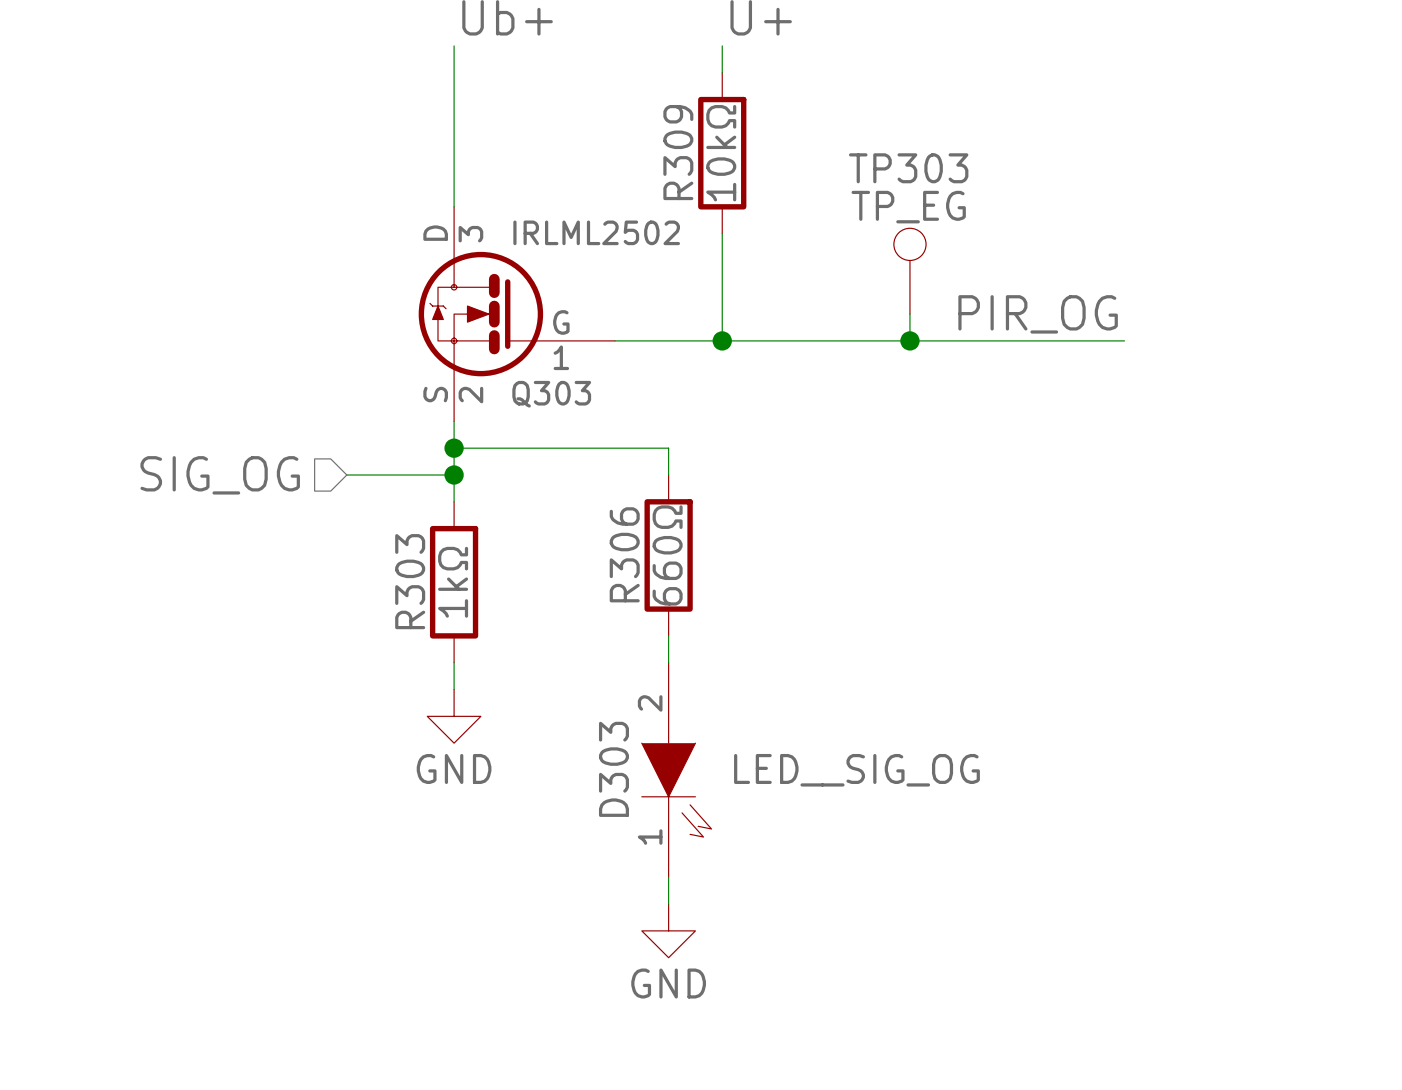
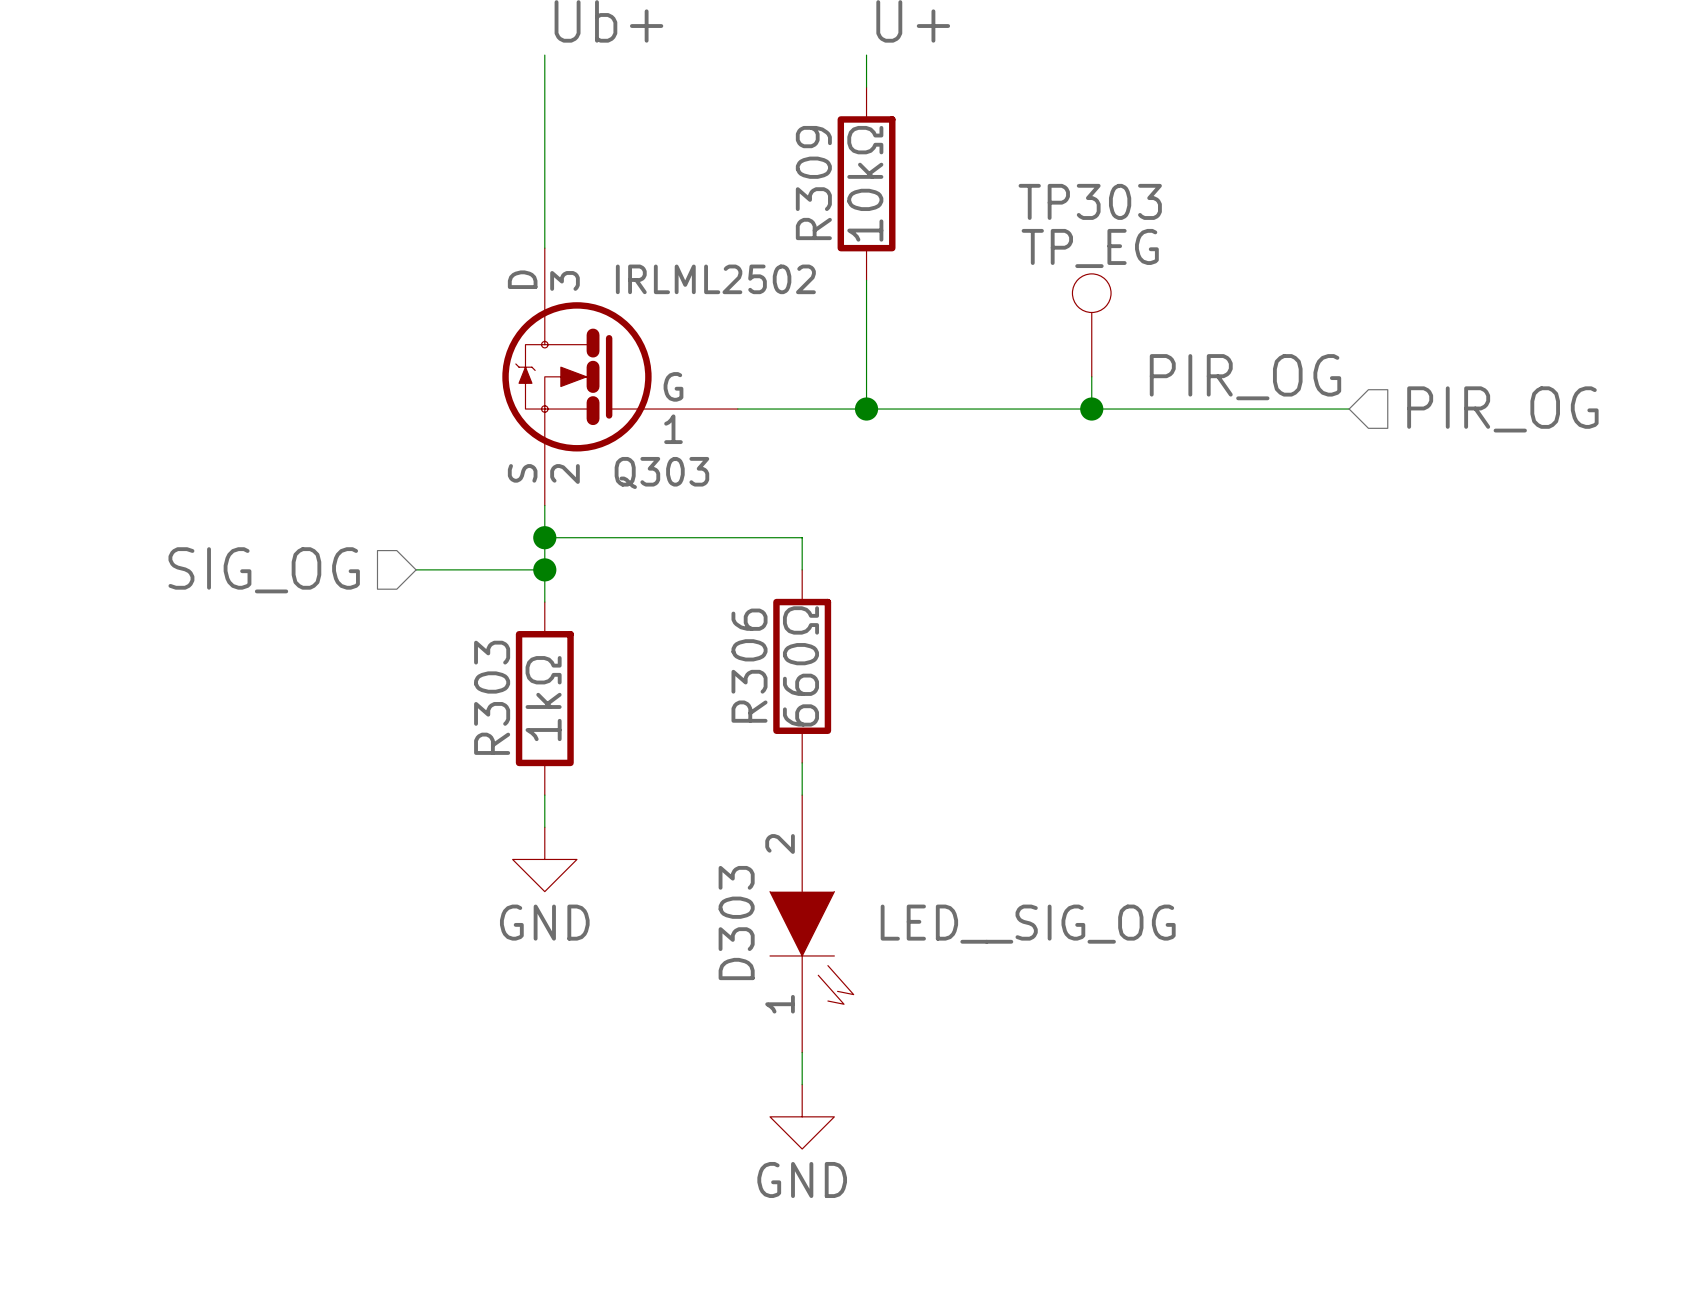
hierarchical label: none -> PIR_OG (1502, 409)

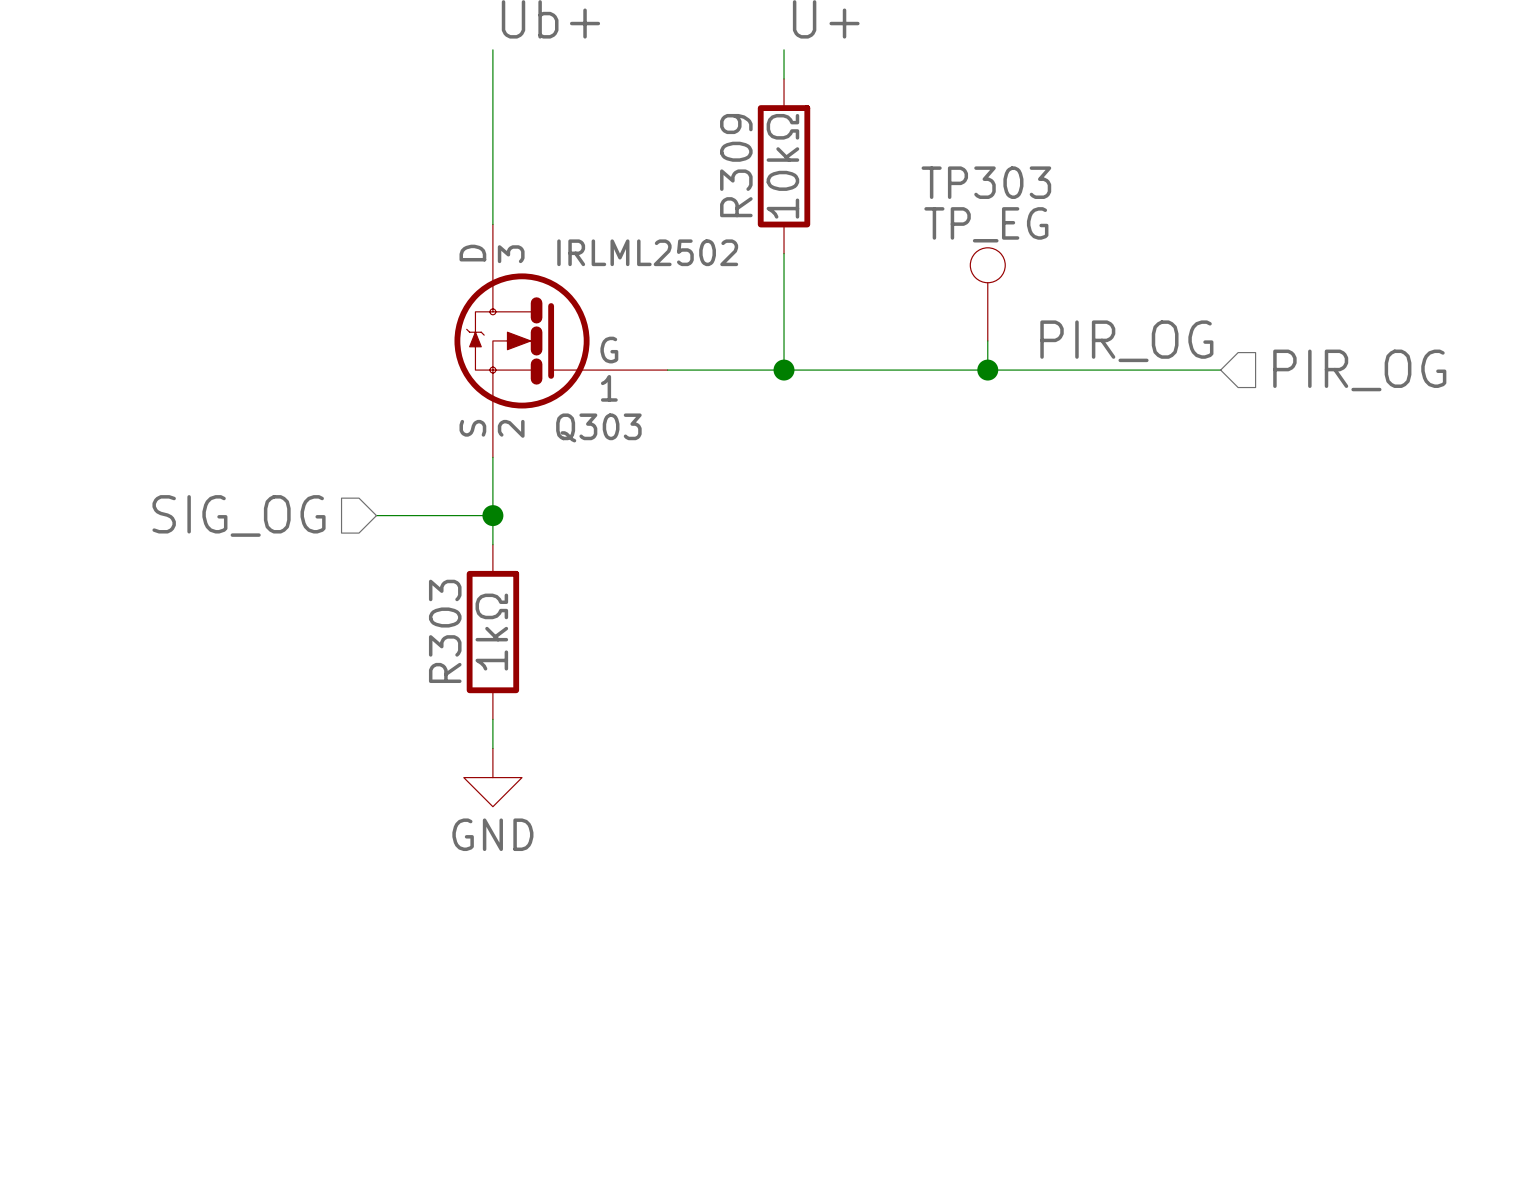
wire: (544, 537) (802, 537) (802, 569) -> none
junction: (544, 537) -> none
R306: 660Ω (802, 666) -> none
wire: (802, 762) (802, 795) -> none
D303: LED__SIG_OG (811, 923) -> none
wire: (802, 1052) (802, 1084) -> none
power symbol: GND (802, 1116) -> none

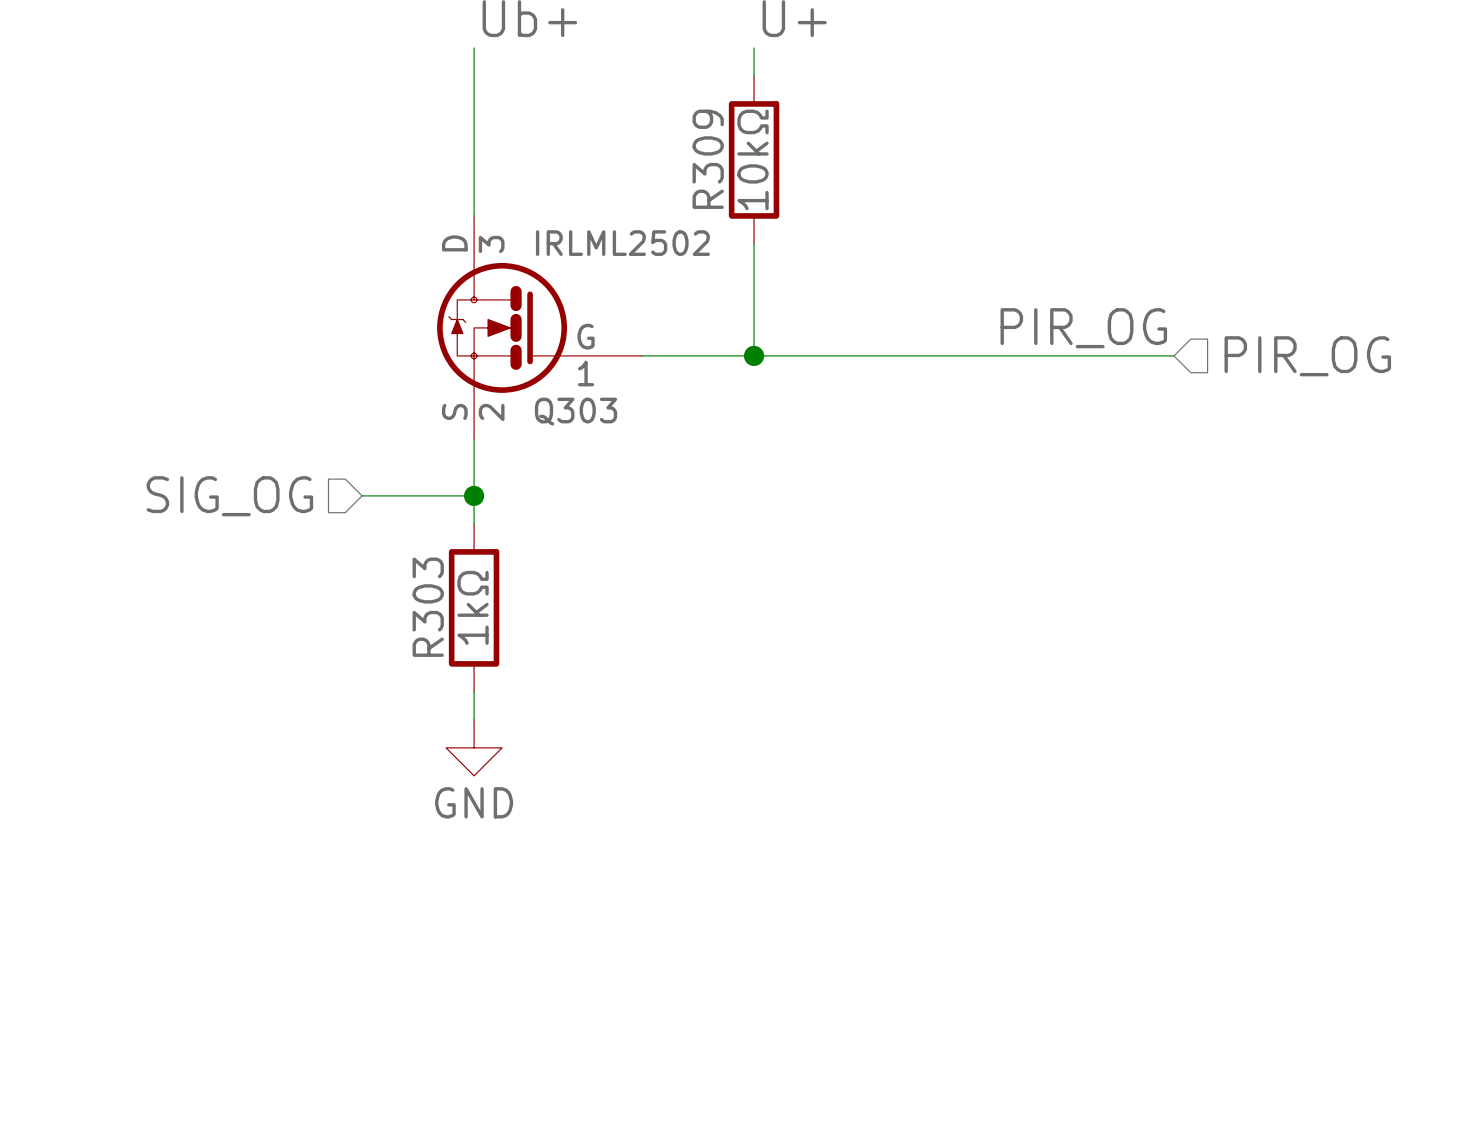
TP303: TP_EG (987, 294) -> none
wire: (987, 340) (987, 370) -> none
junction: (987, 370) -> none

